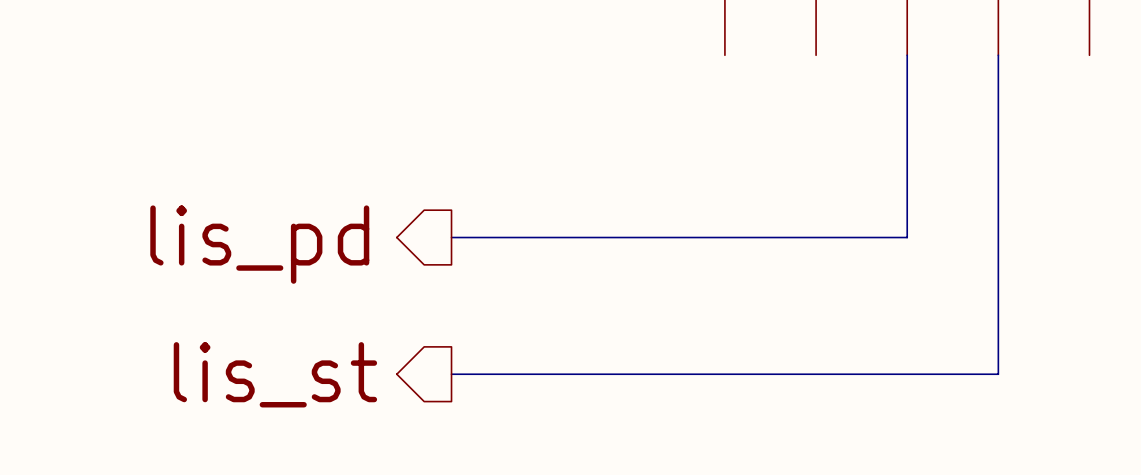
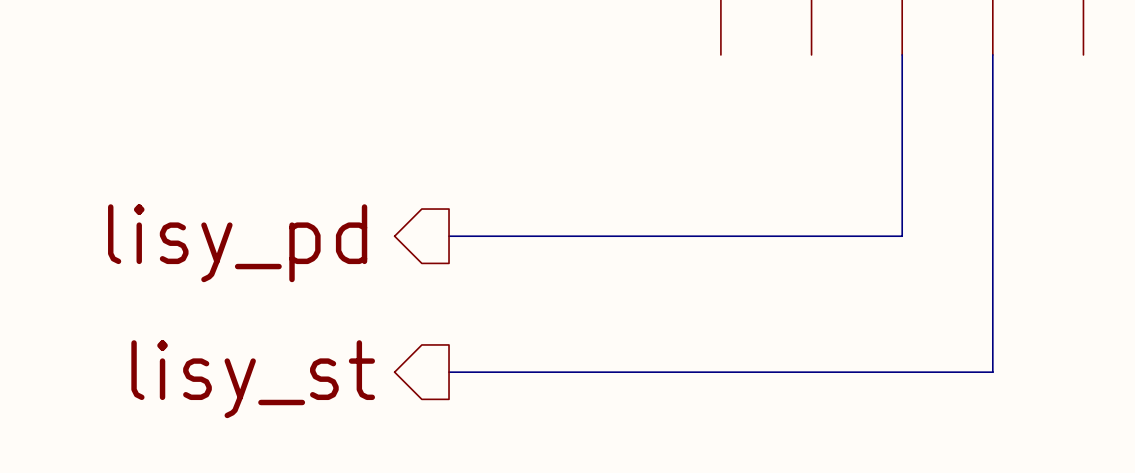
hierarchical label: lis_pd (259, 244) -> lisy_pd (237, 243)
hierarchical label: lis_st (275, 374) -> lisy_st (253, 379)

